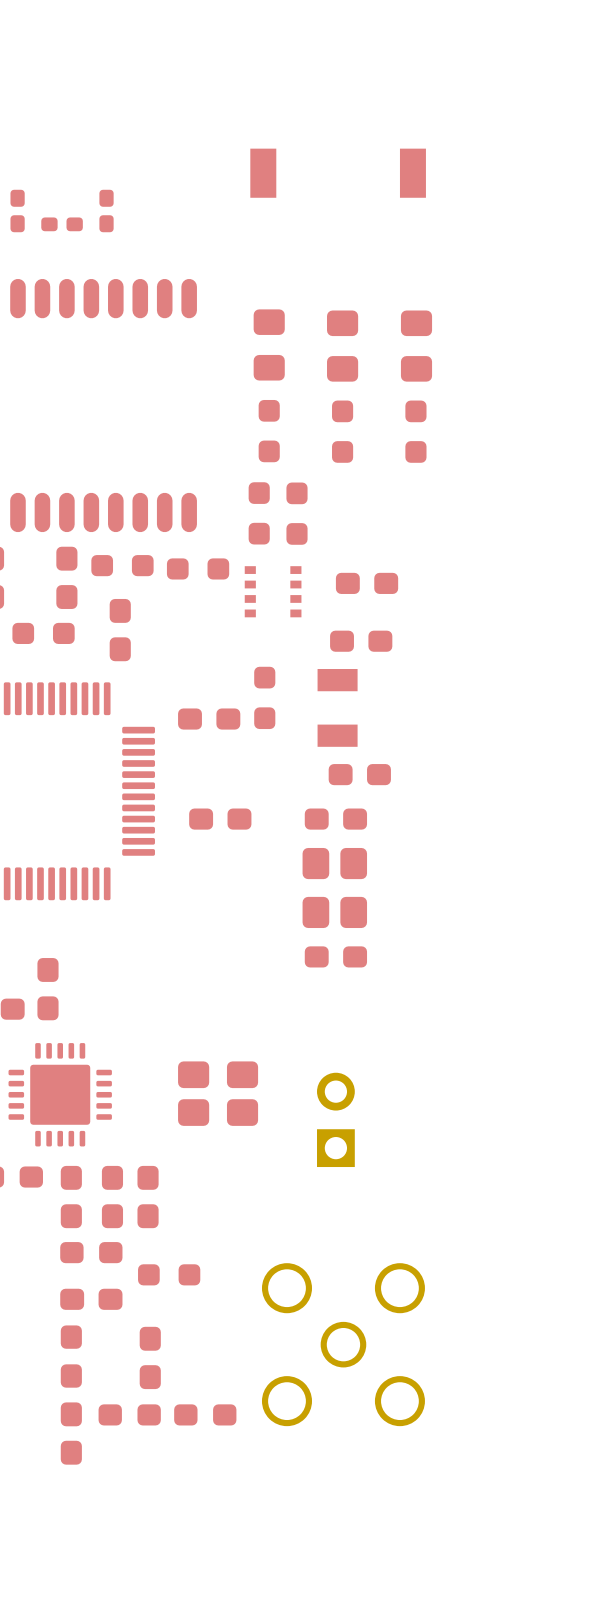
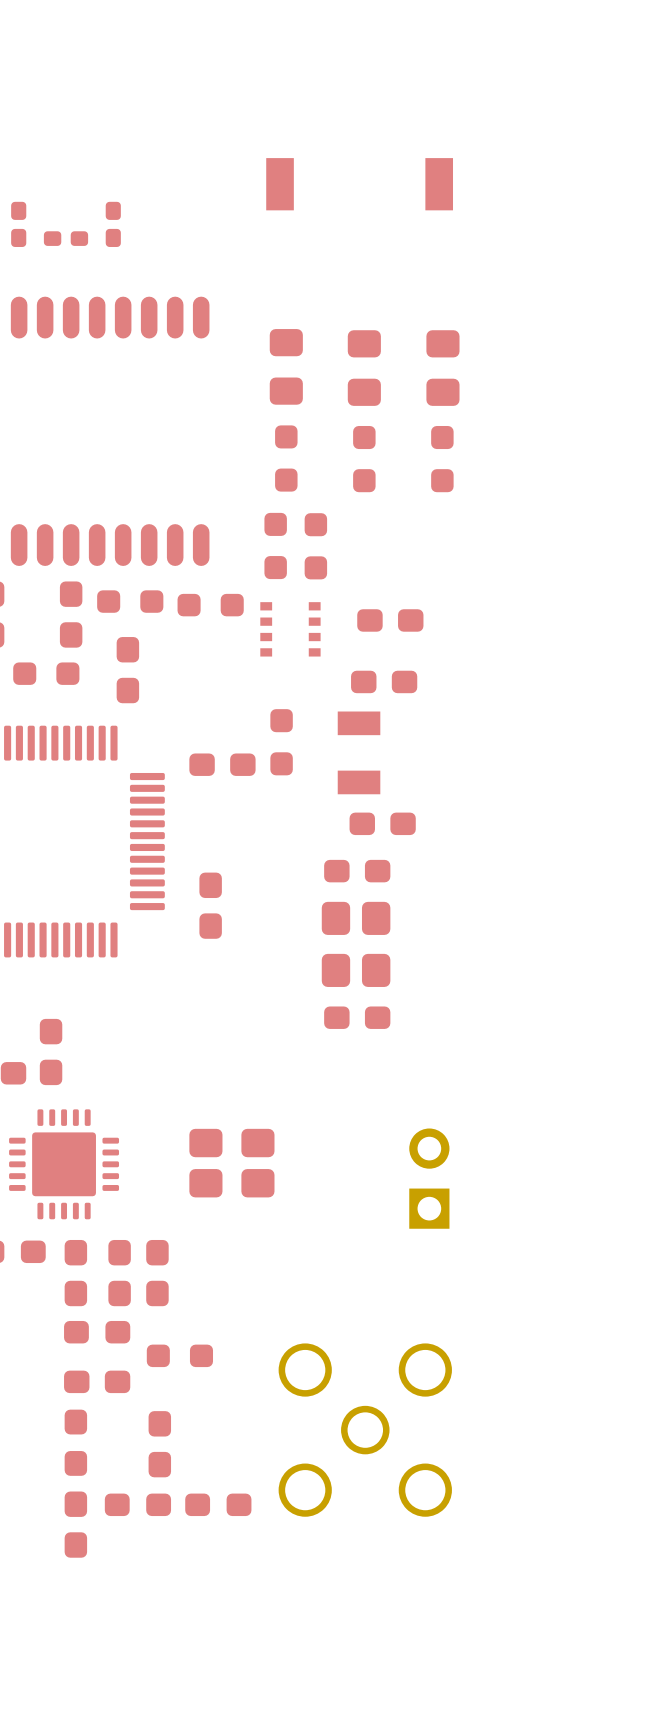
part rotation: 0° (220, 819) -> 90° clockwise (210, 905)
part position: (220, 819) -> (210, 905)
part position: (335, 1119) -> (429, 1178)

